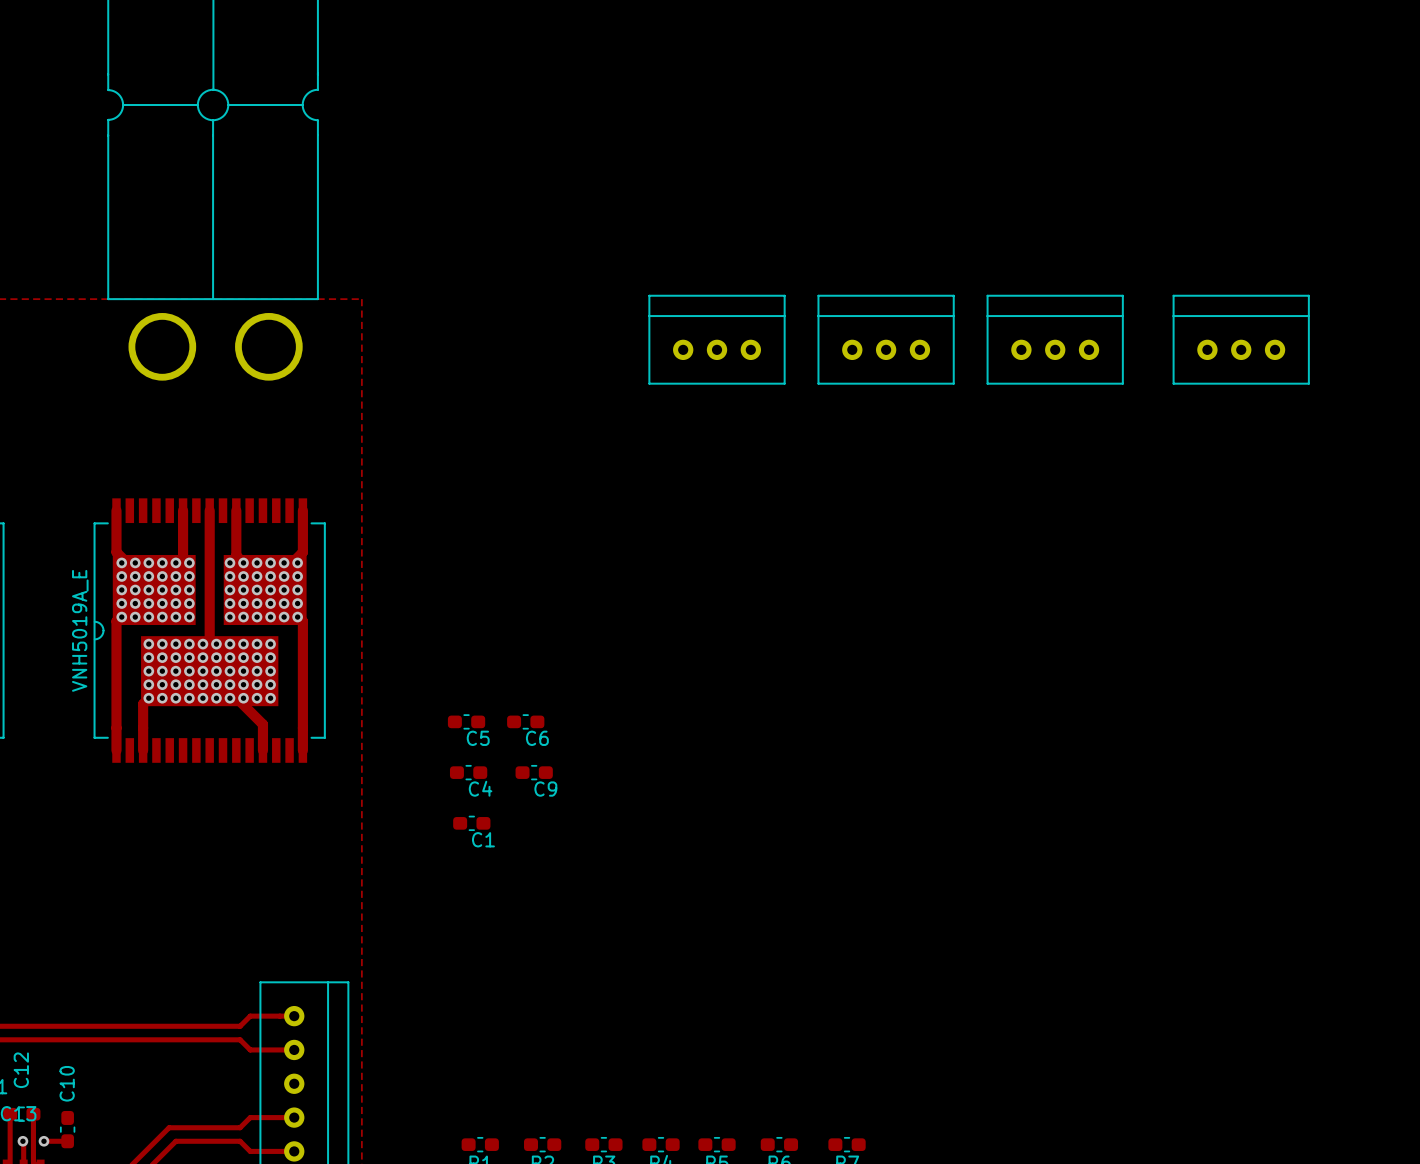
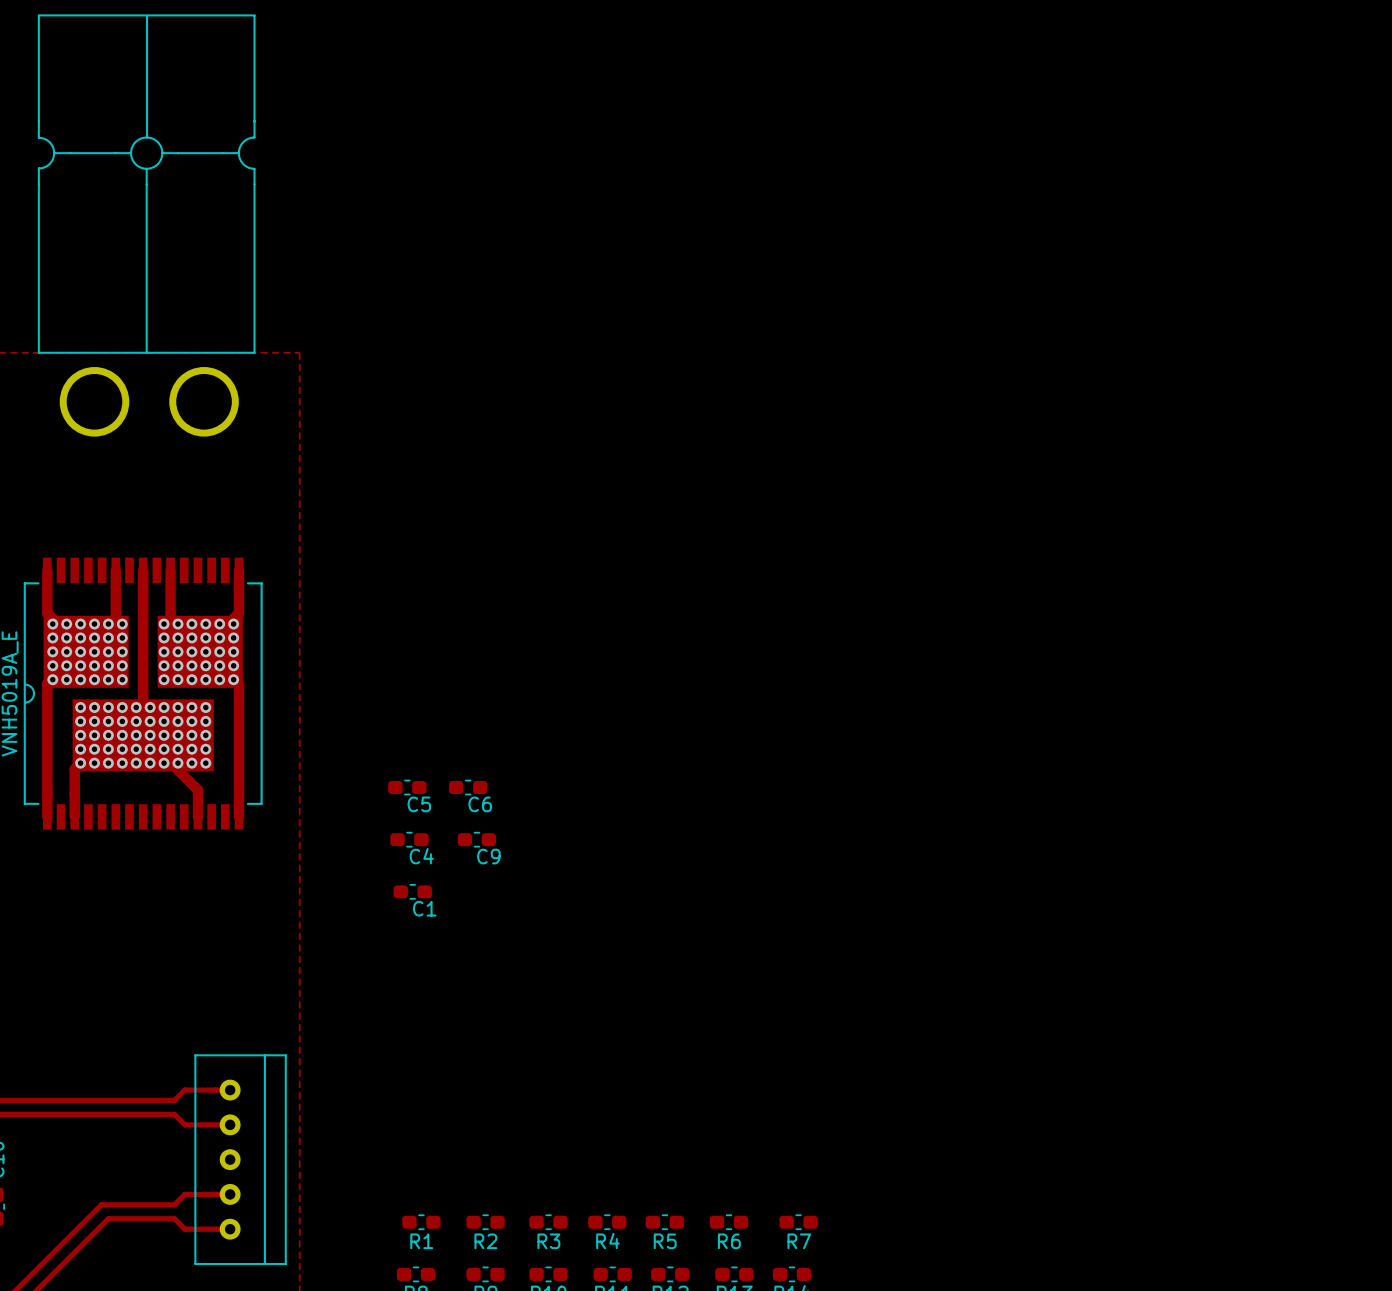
part: (717, 339) -> none
part: (886, 339) -> none
part: (1055, 339) -> none
part: (1241, 339) -> none

